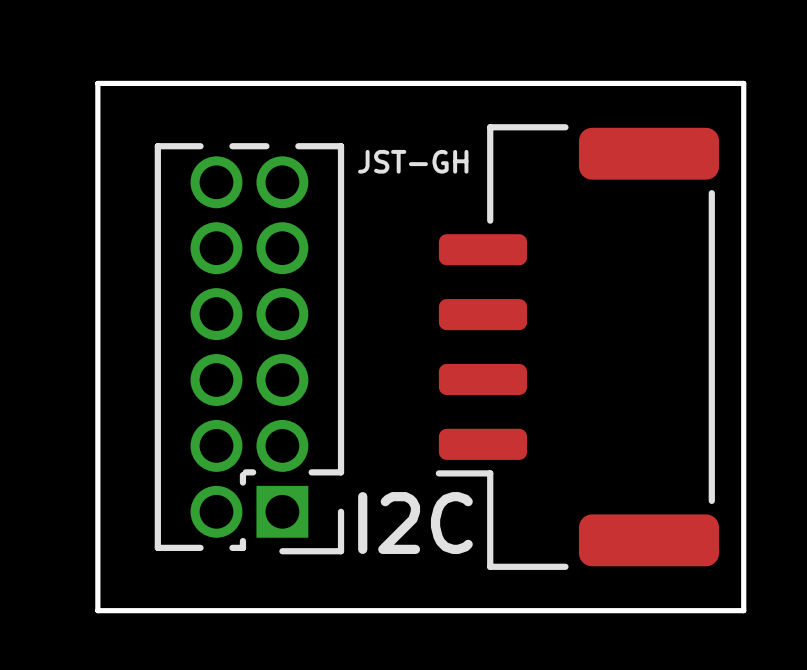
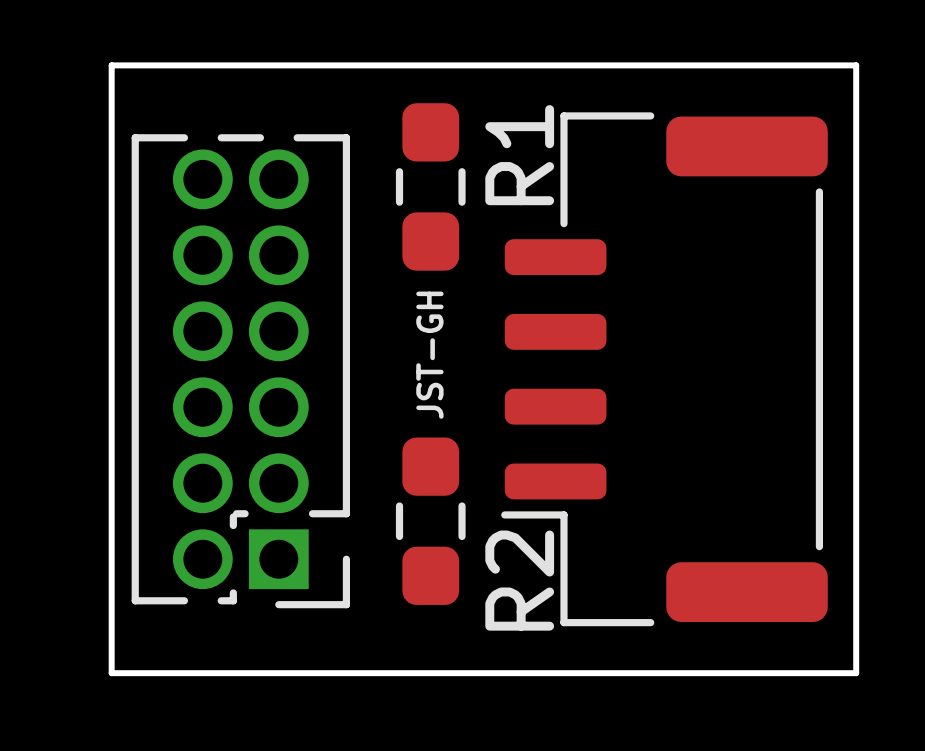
text rotation: 0° (413, 161) -> 90° counterclockwise (429, 355)
text position: JST-GH (413, 161) -> JST-GH (429, 355)
R1: none -> (430, 186)
part position: (249, 348) -> (240, 371)
R2: none -> (430, 521)
text: I2C (415, 523) -> none

